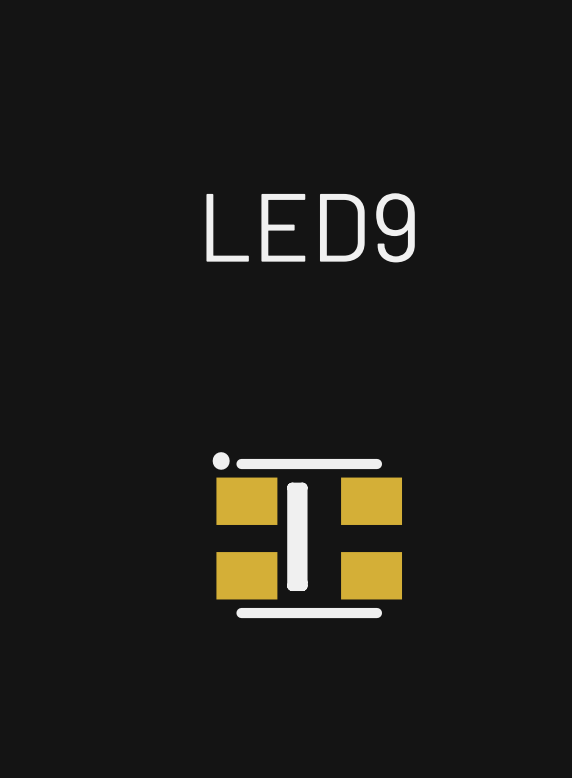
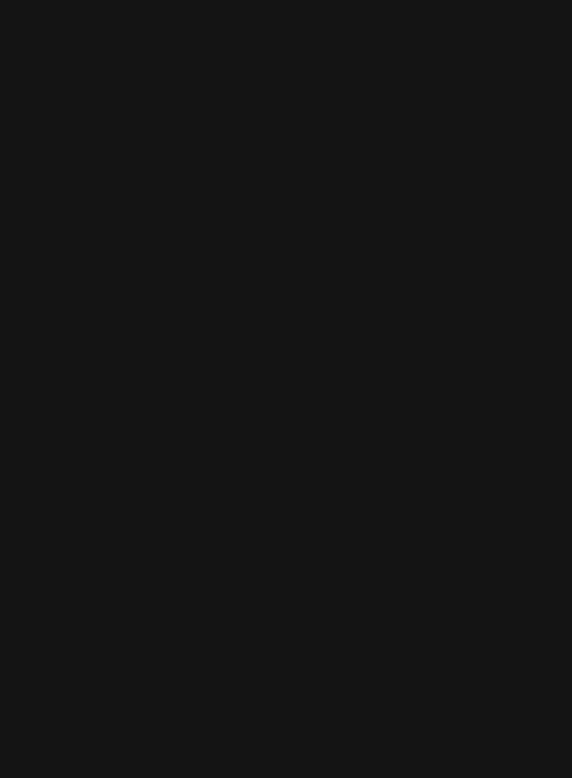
LED9: (307, 535) -> none

